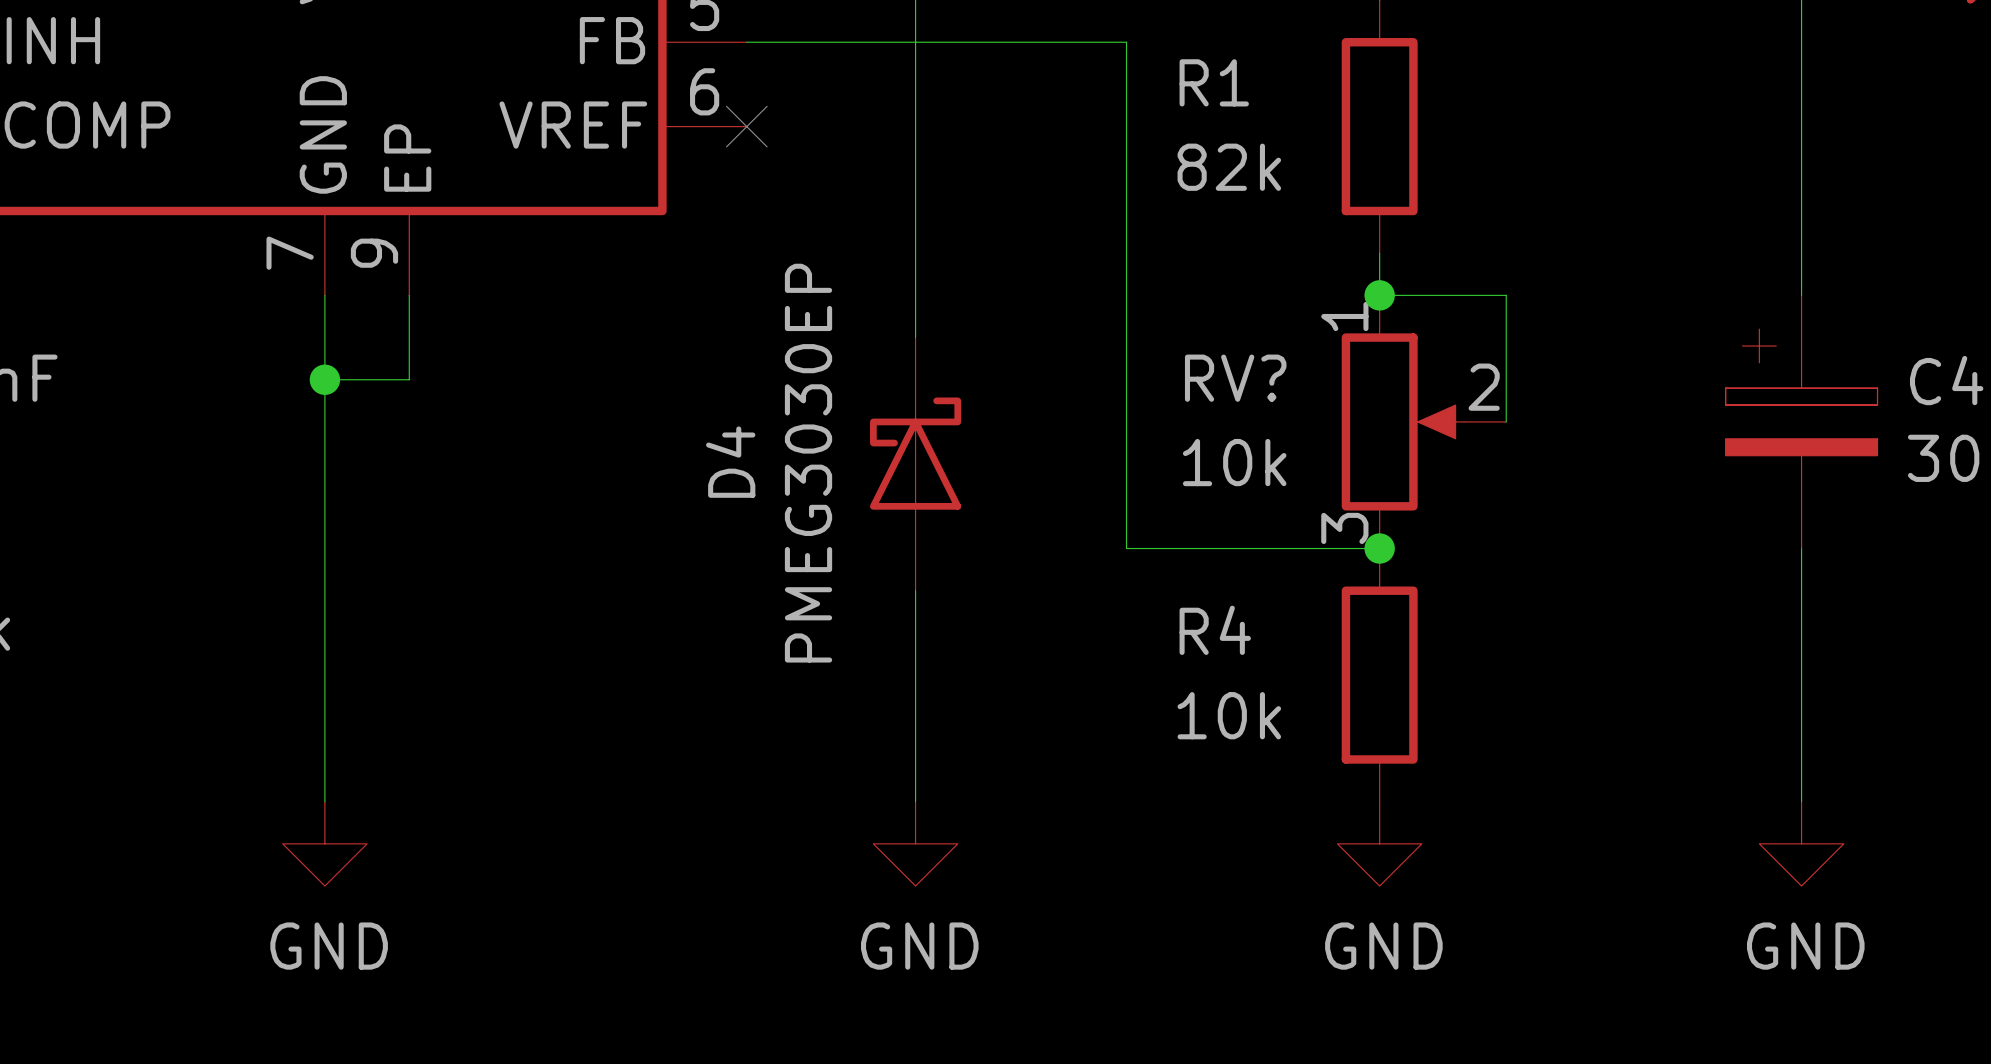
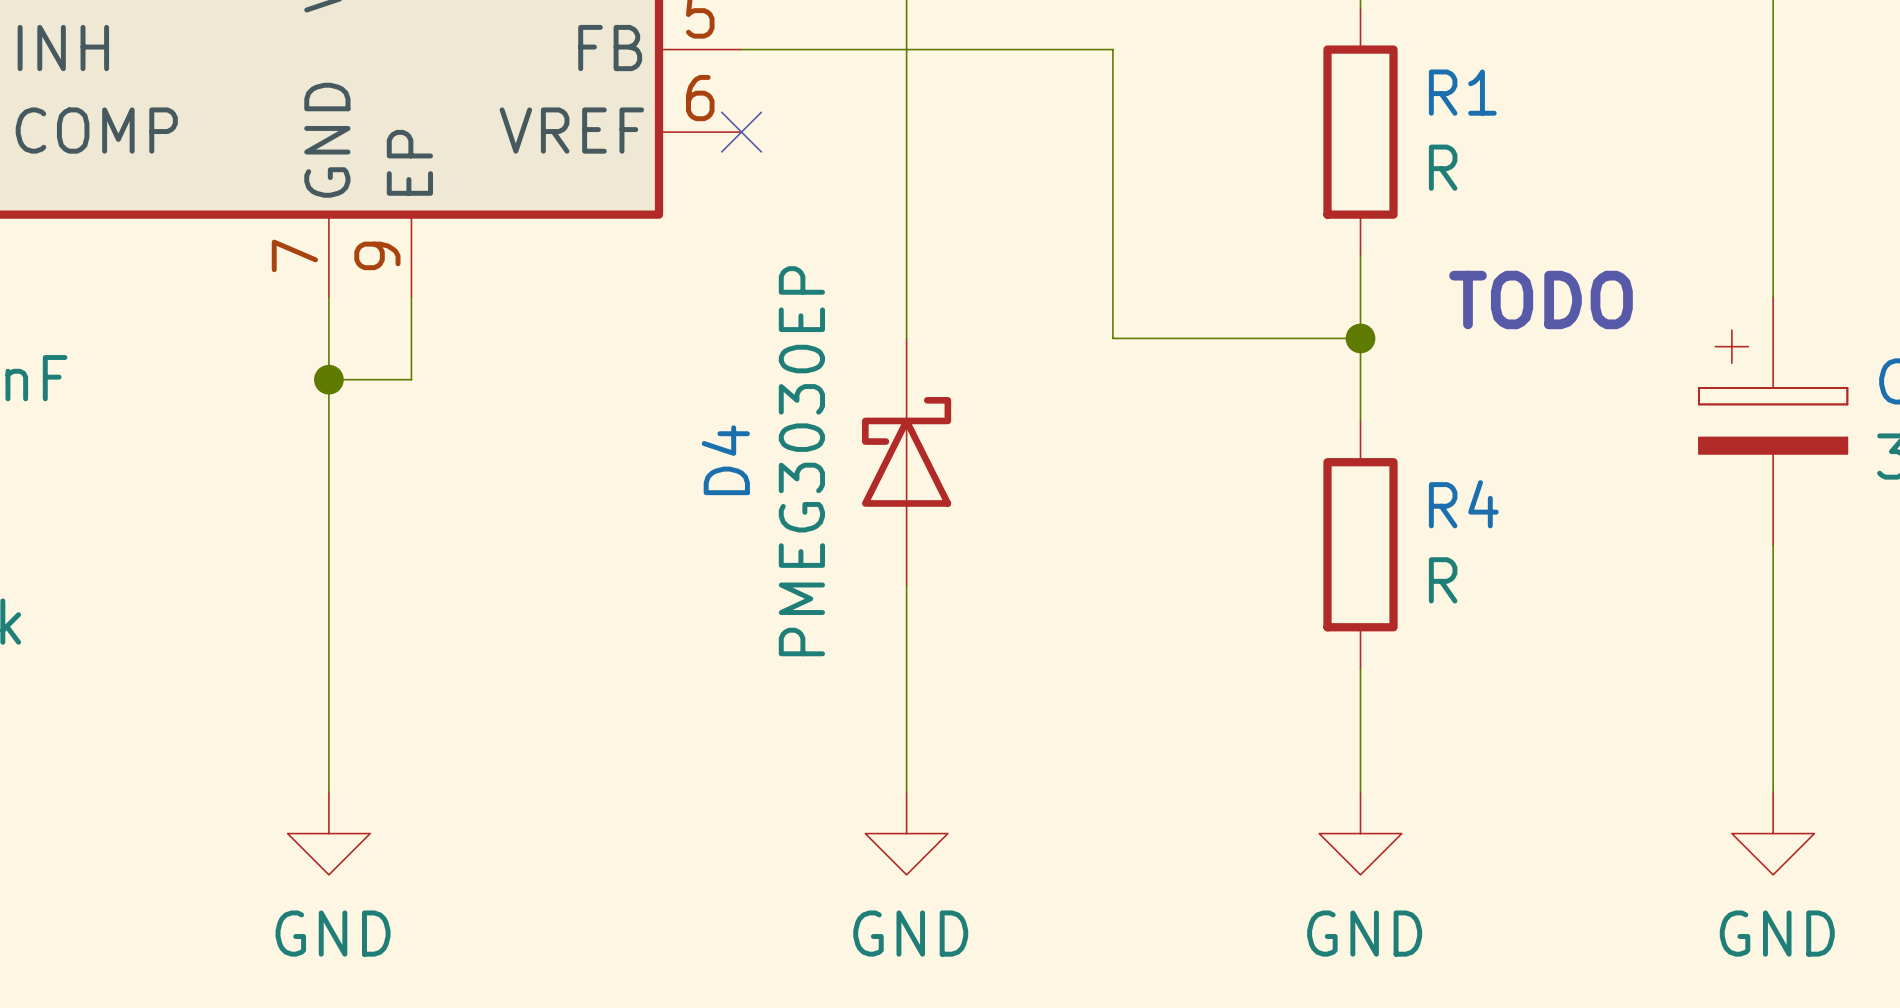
R1 name position: R1 (1214, 82) -> R1 (1462, 92)
R1 value: 82k (1229, 167) -> R (1443, 167)
wire: (1379, 295) (1506, 295) (1506, 421) -> (1360, 297) (1360, 420)
junction position: (1379, 295) -> (1360, 338)
text: none -> TODO (1541, 299)
wire: (1126, 337) (1126, 548) (1379, 548) -> (1112, 338) (1360, 338)
RV?: 10k (1423, 421) -> none
junction: (1379, 548) -> none
R4 name position: R4 (1215, 630) -> R4 (1463, 504)
wire: none -> (1360, 668) (1360, 792)
R4 position: (1379, 675) -> (1360, 544)
R4 value: 10k (1229, 715) -> R (1443, 580)

